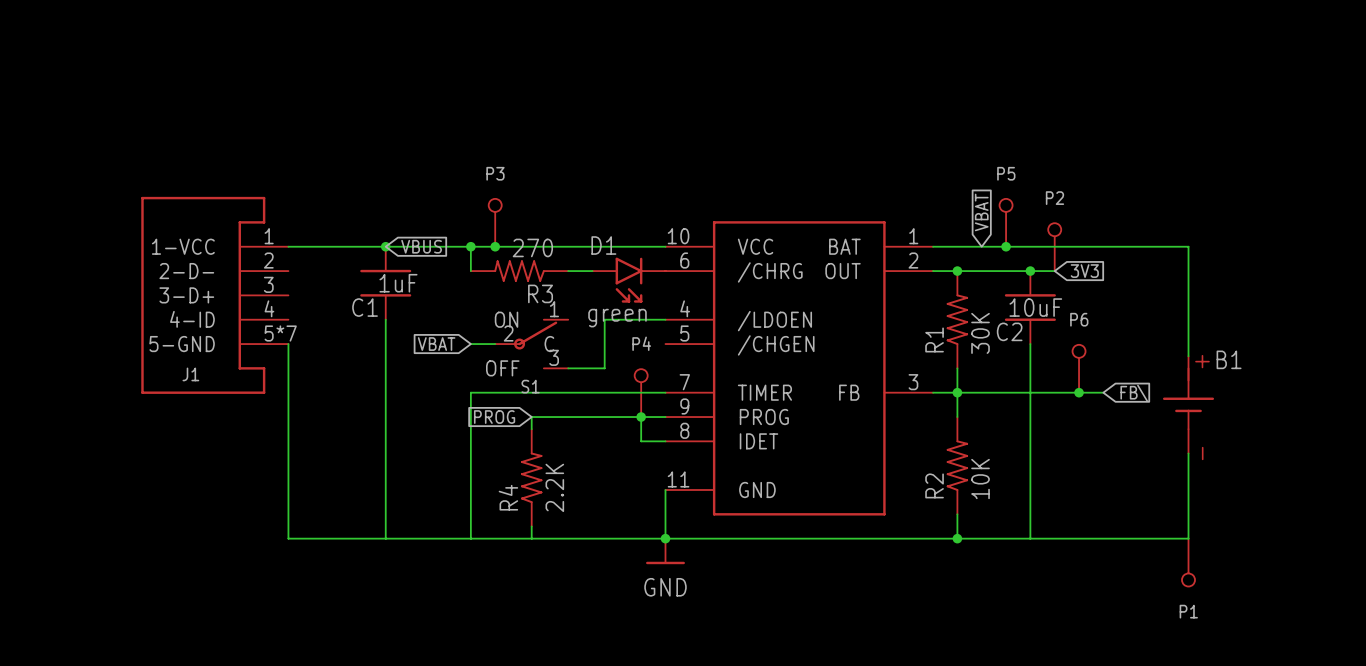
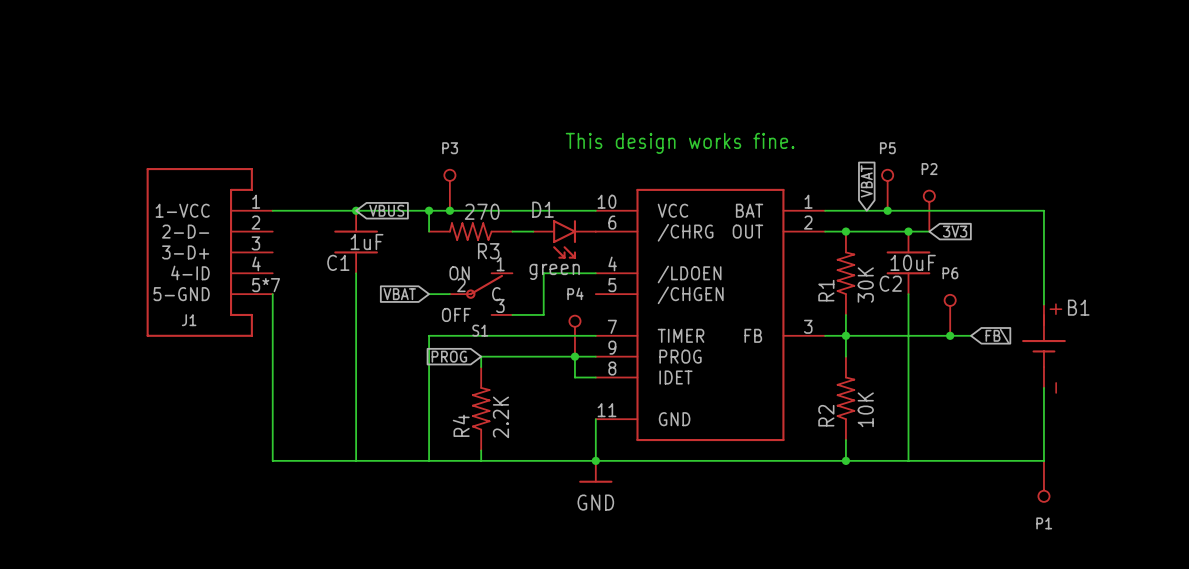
text: none -> This design works fine. (680, 143)

